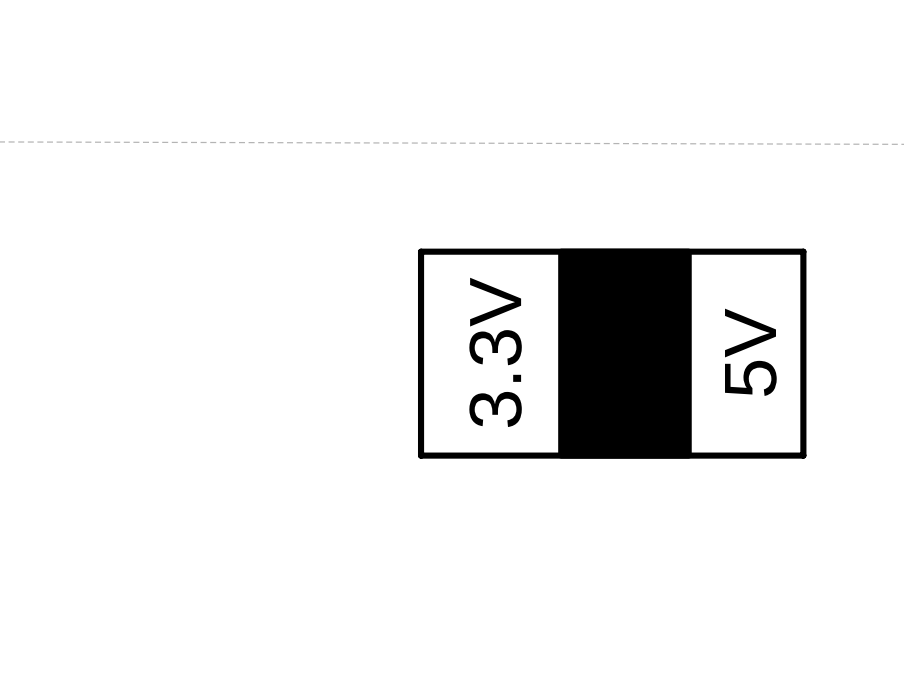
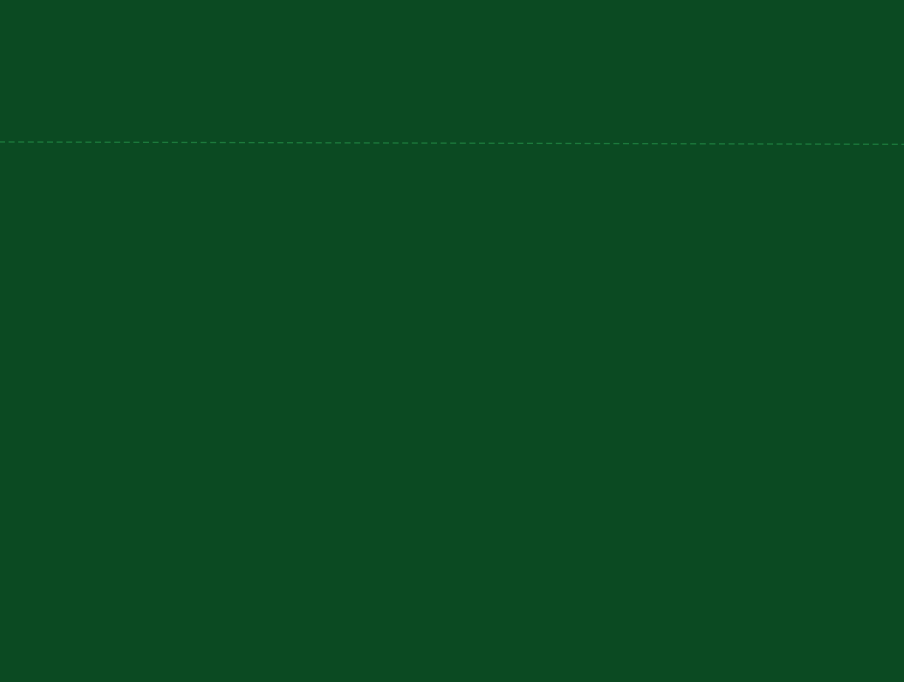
drawing: [558, 248, 692, 459] -> none
line: (421, 251) (803, 251) (803, 455) (421, 455) (421, 251) -> none
text: 3.3V (495, 352) -> none
text: 5V (750, 352) -> none

